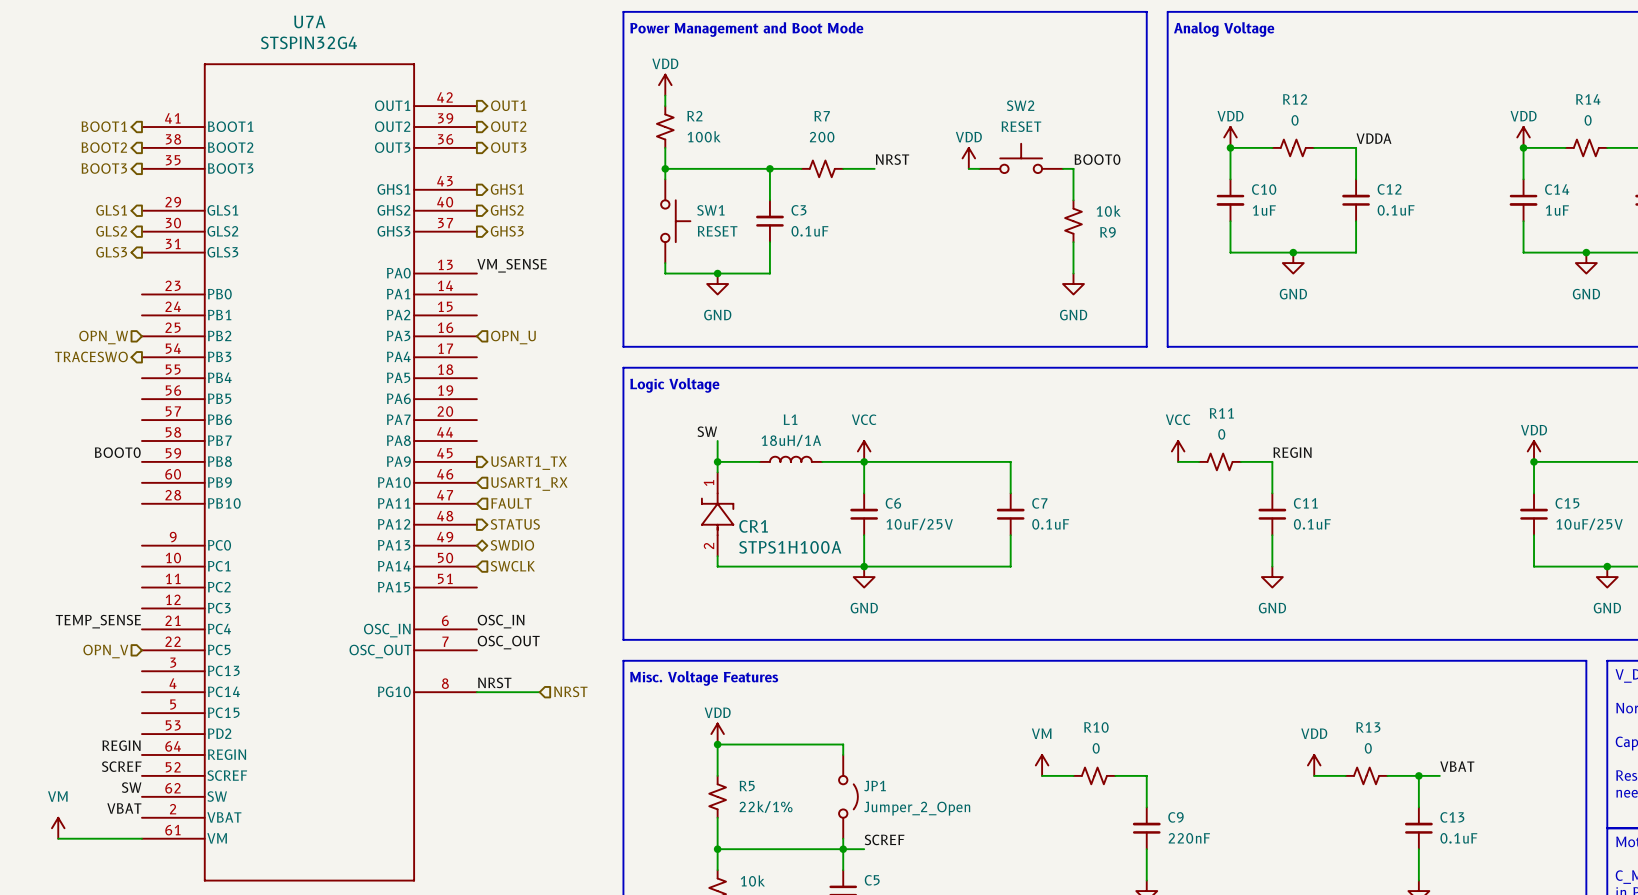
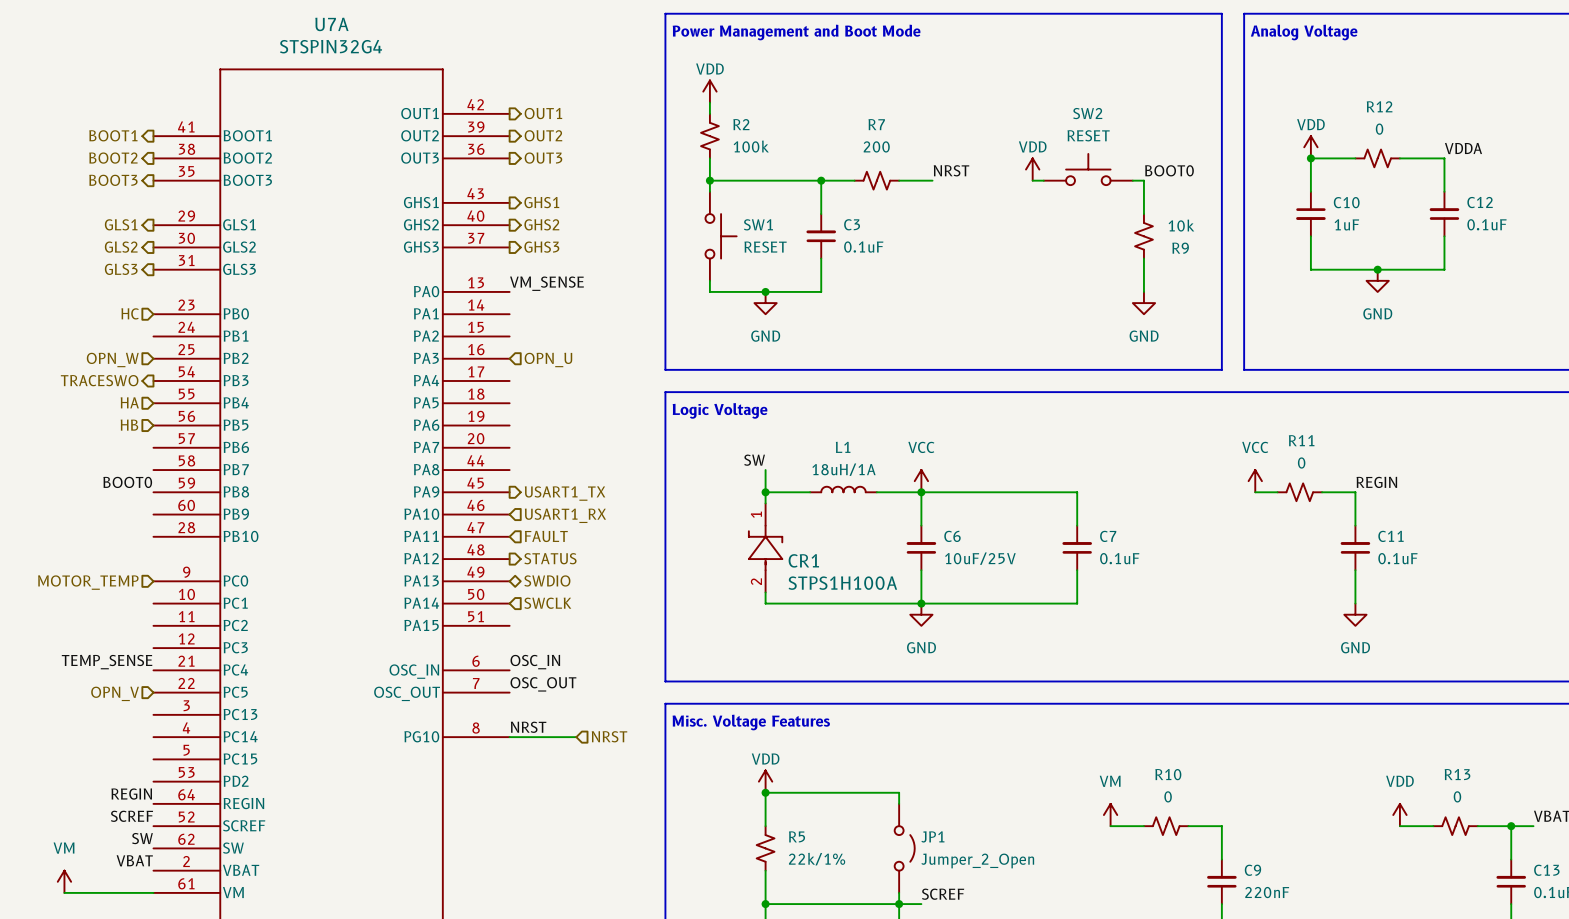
hierarchical label: none -> HC (130, 313)
hierarchical label: none -> HA (129, 402)
hierarchical label: none -> HB (129, 425)
hierarchical label: none -> MOTOR_TEMP (88, 582)

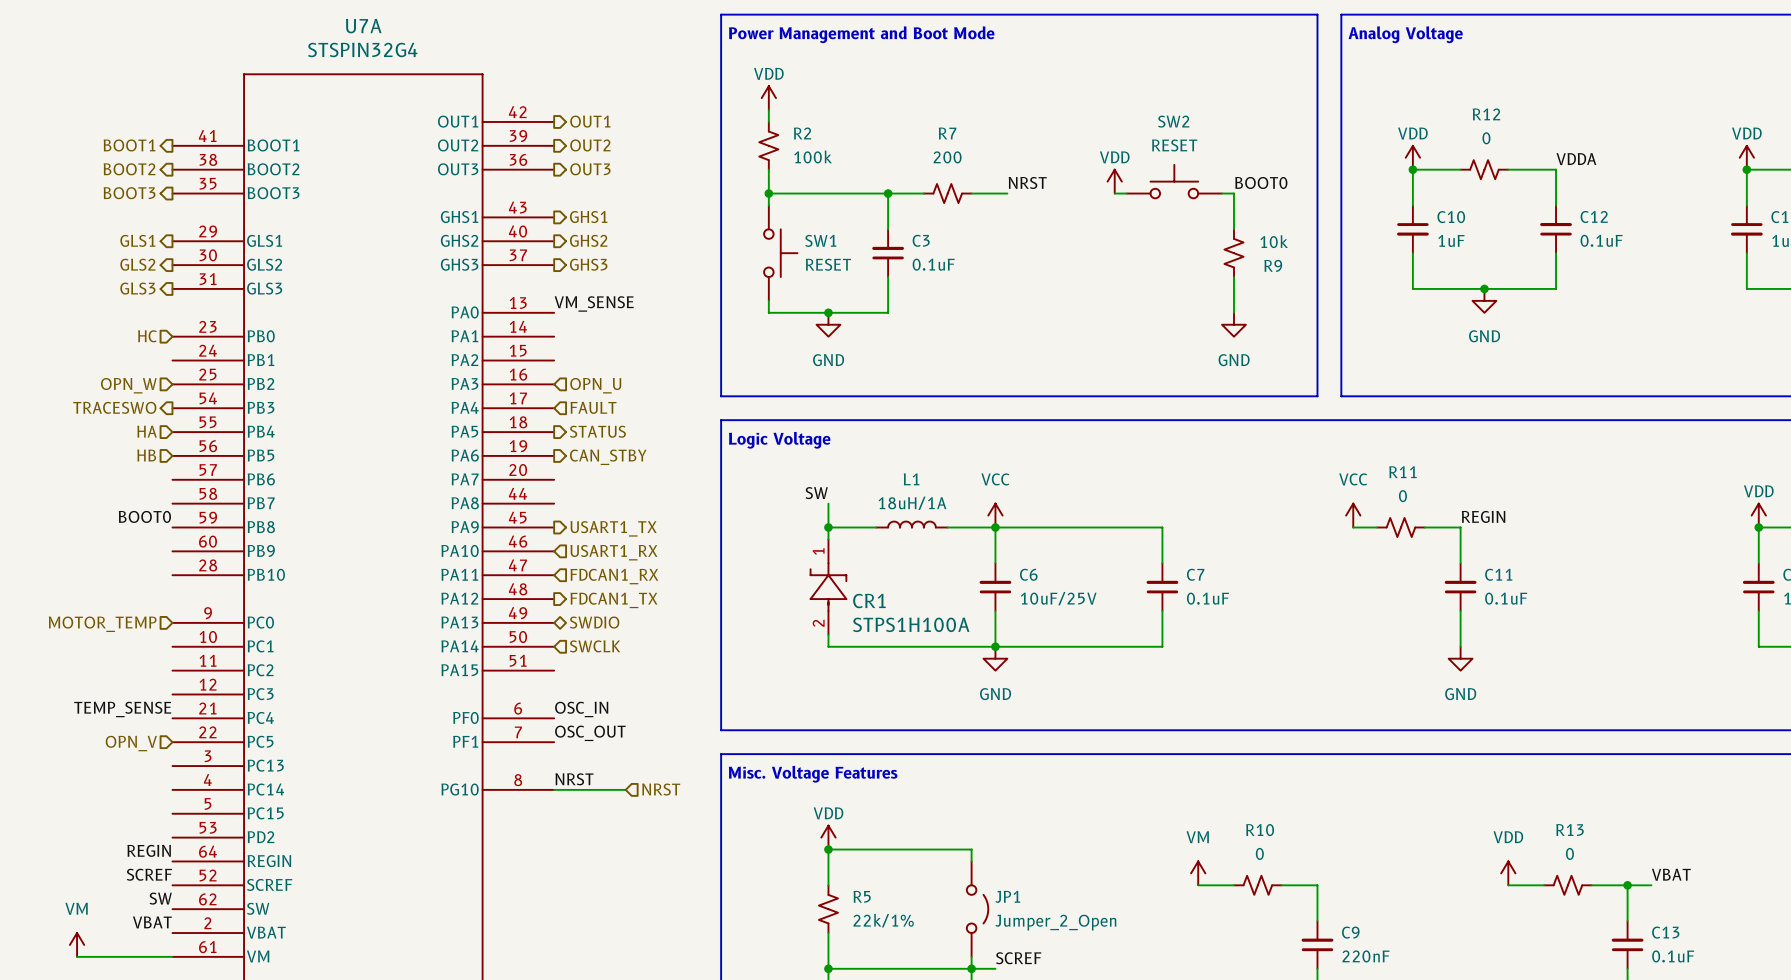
hierarchical label: none -> FAULT (593, 407)
hierarchical label: none -> STATUS (597, 431)
hierarchical label: none -> CAN_STBY (608, 457)
hierarchical label: FAULT (546, 536) -> FDCAN1_RX (614, 576)
hierarchical label: STATUS (550, 558) -> FDCAN1_TX (613, 600)
U7A pin name: OSC_IN (414, 671) -> PF0 (465, 717)
U7A pin name: OSC_OUT (407, 693) -> PF1 (465, 741)

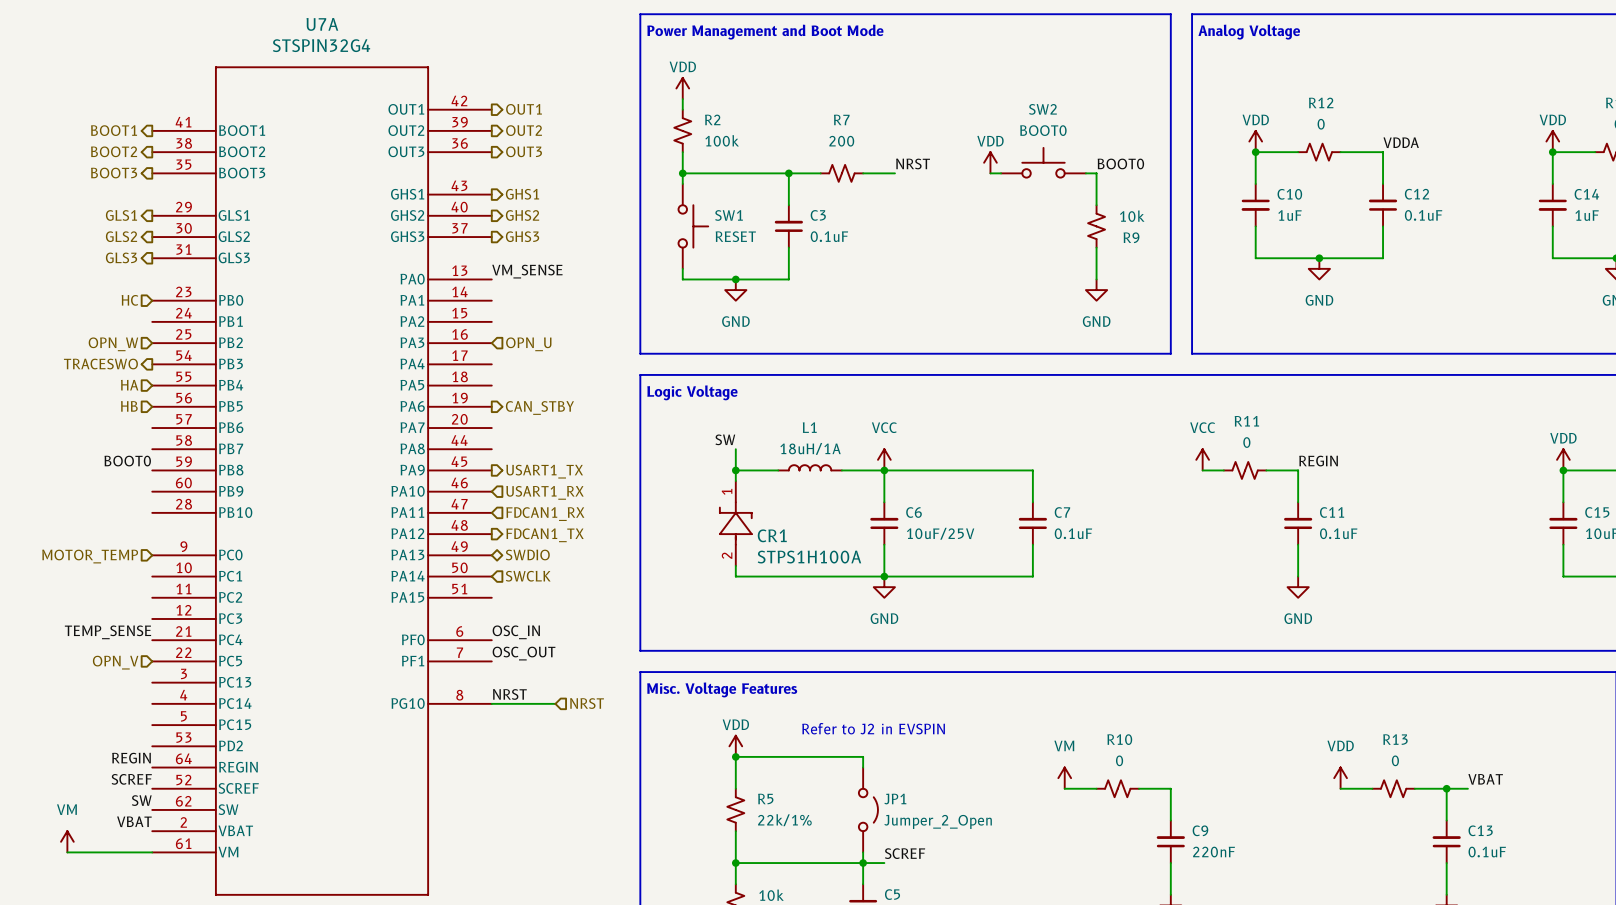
SW2 value: RESET (1174, 145) -> BOOT0 (1043, 130)
hierarchical label: FAULT (593, 407) -> none
hierarchical label: STATUS (597, 431) -> none
text: none -> Refer to J2 in EVSPIN (873, 728)

